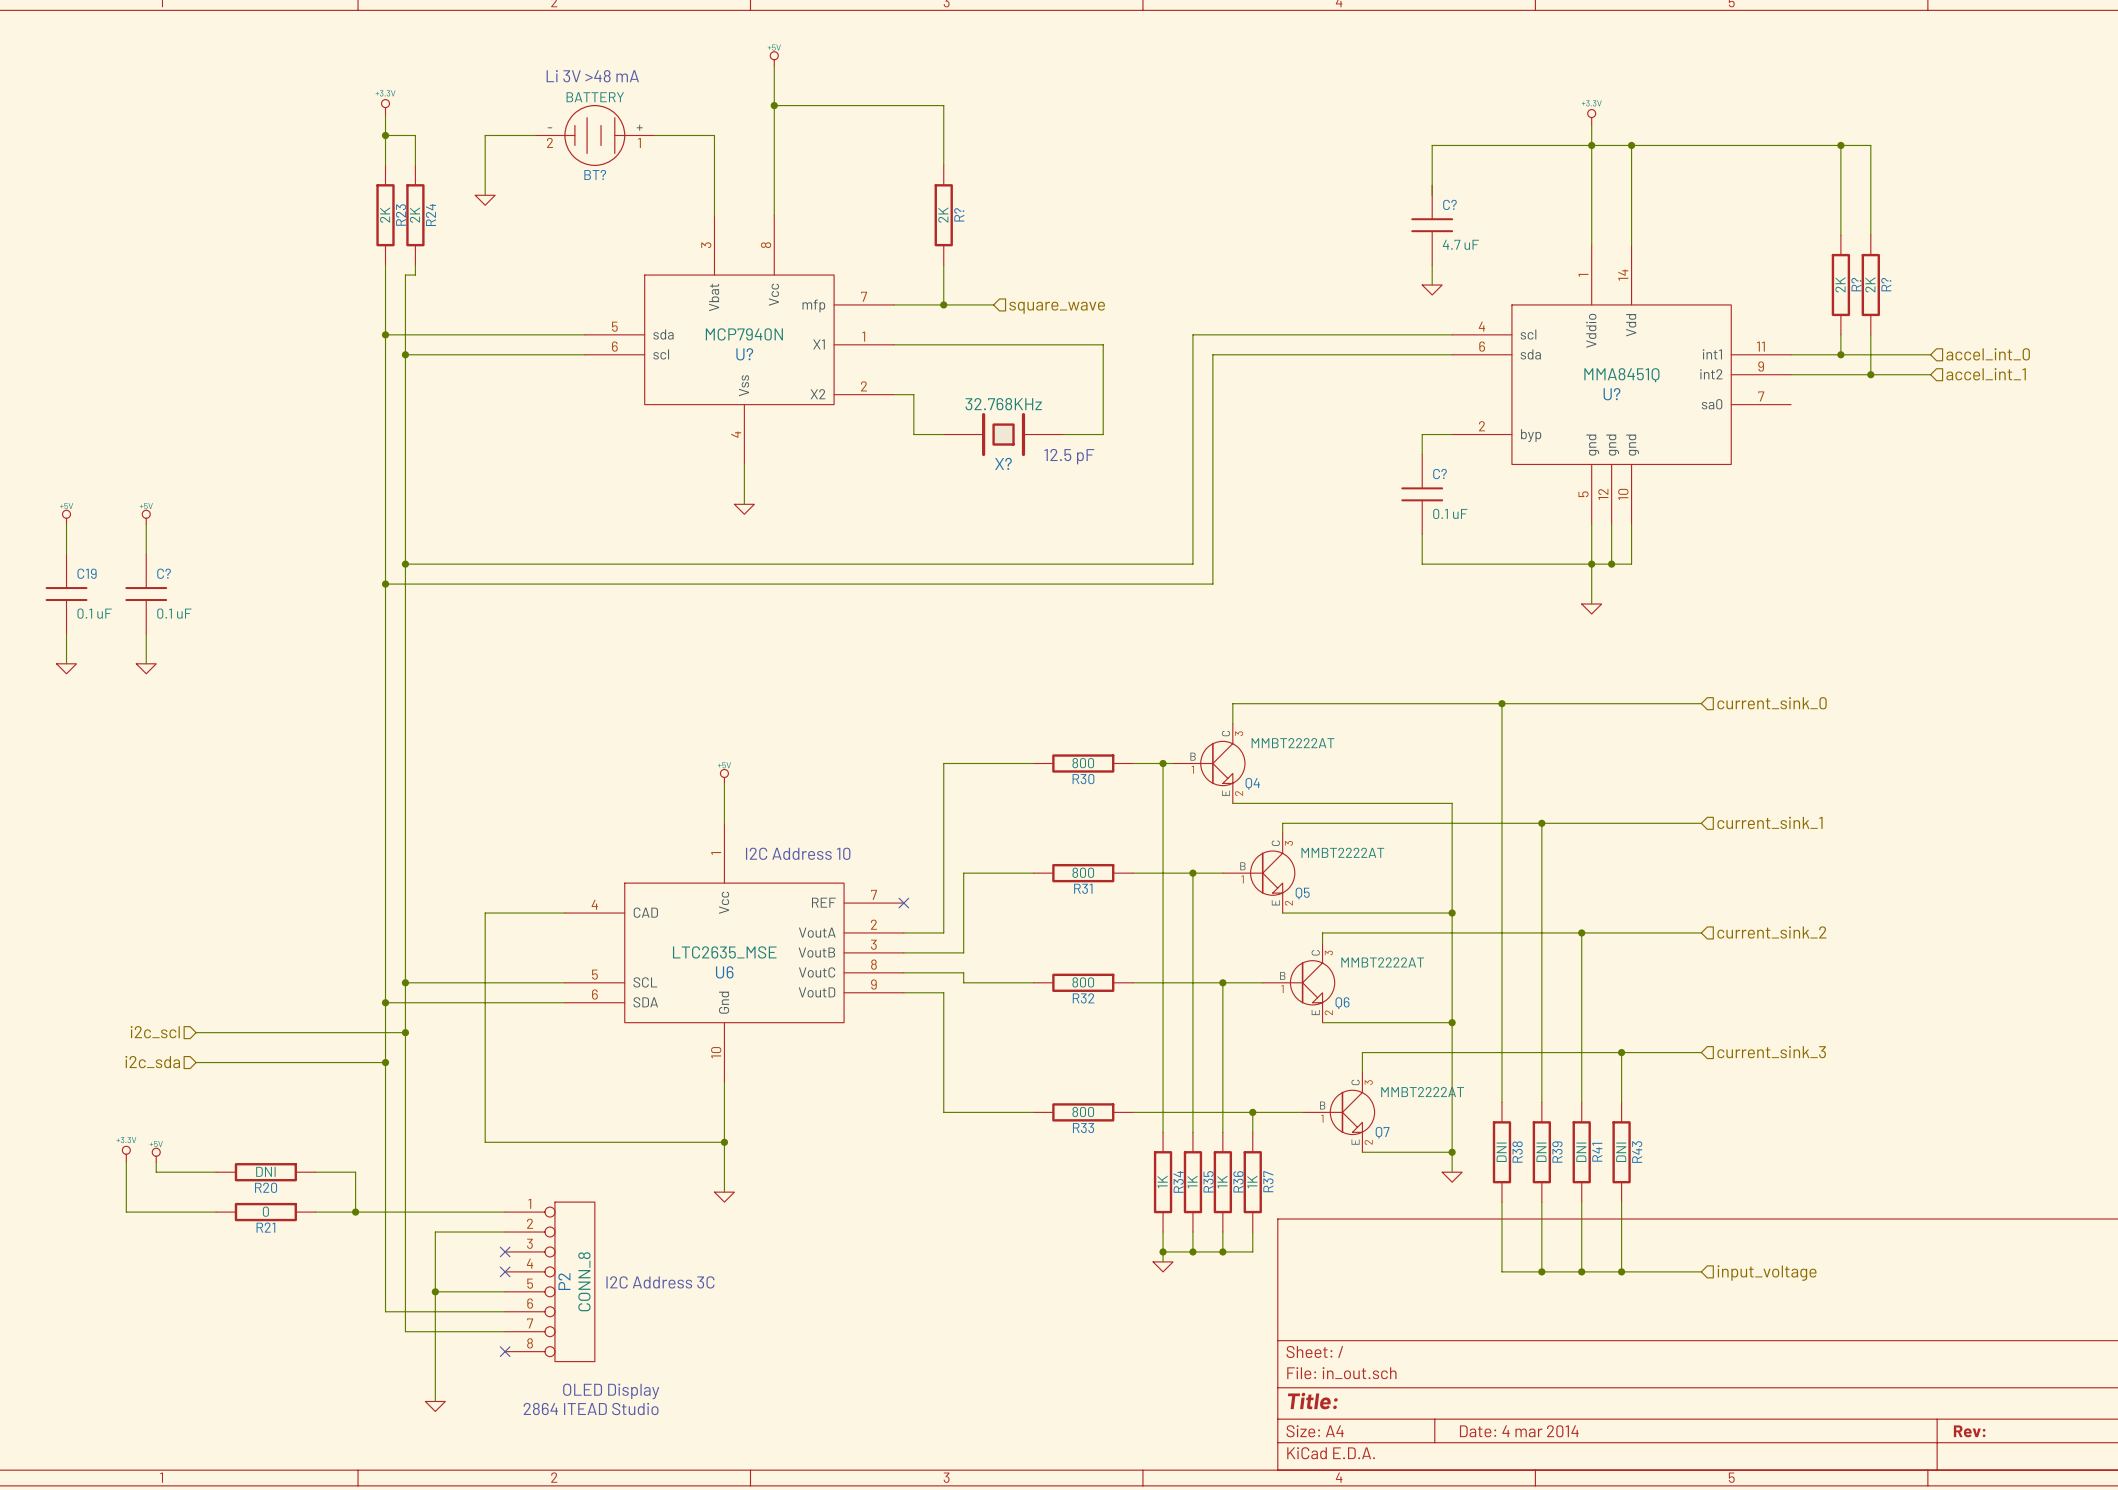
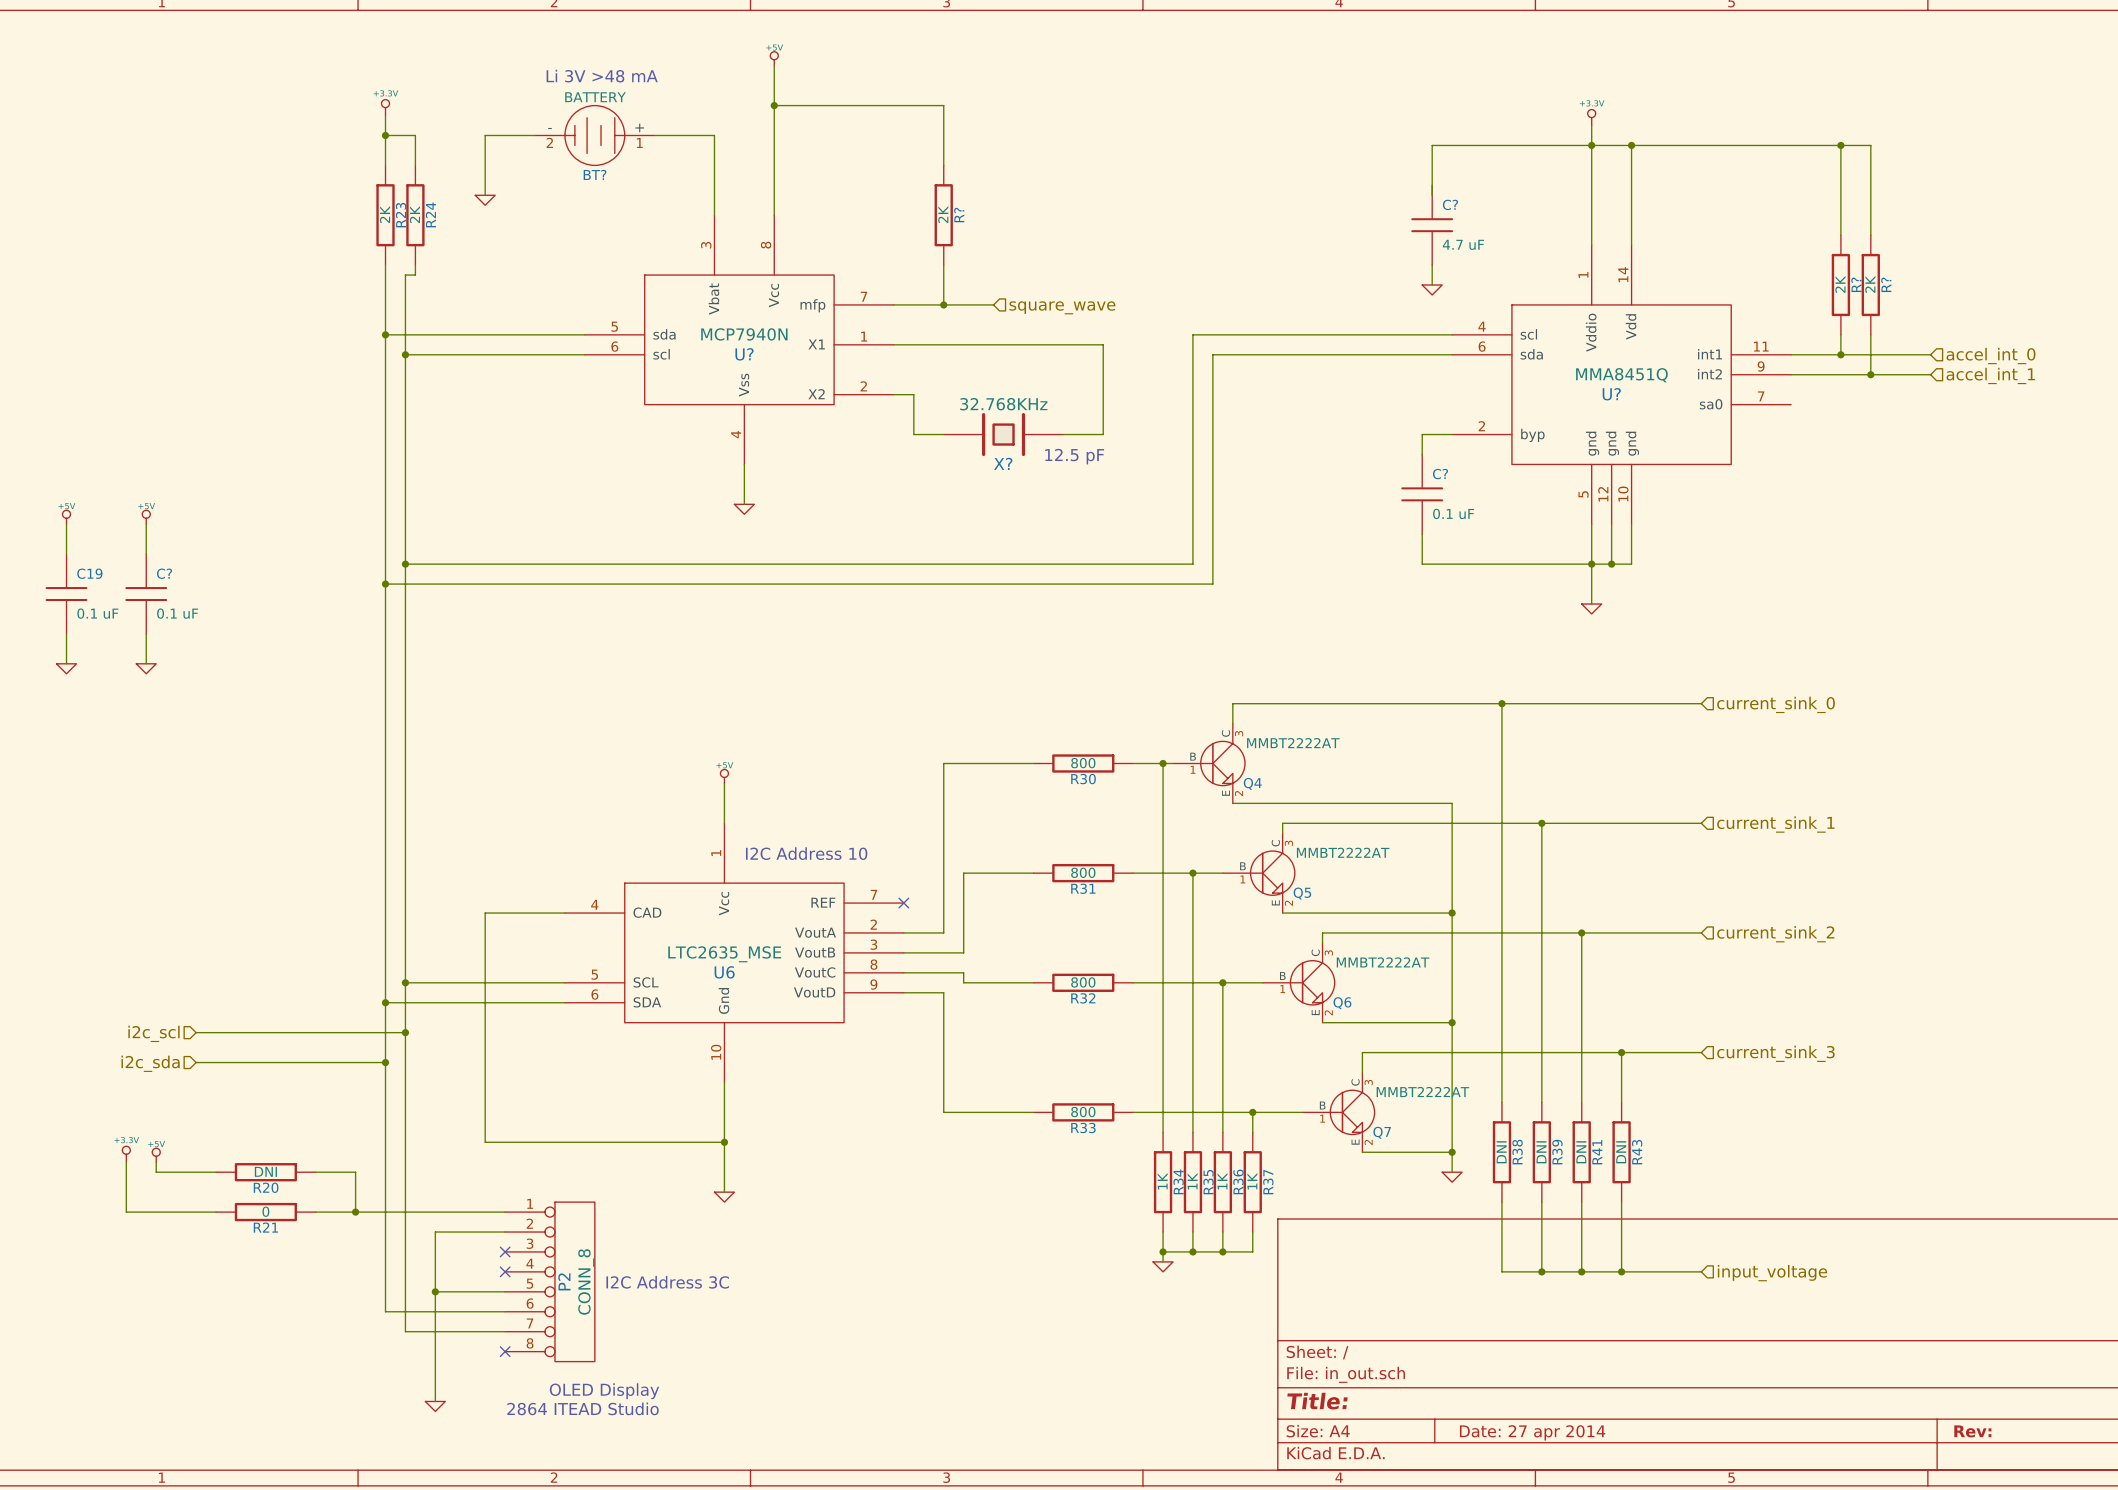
title block: Date: 4 mar 2014 (1519, 1431) -> Date: 27 apr 2014 (1532, 1432)

